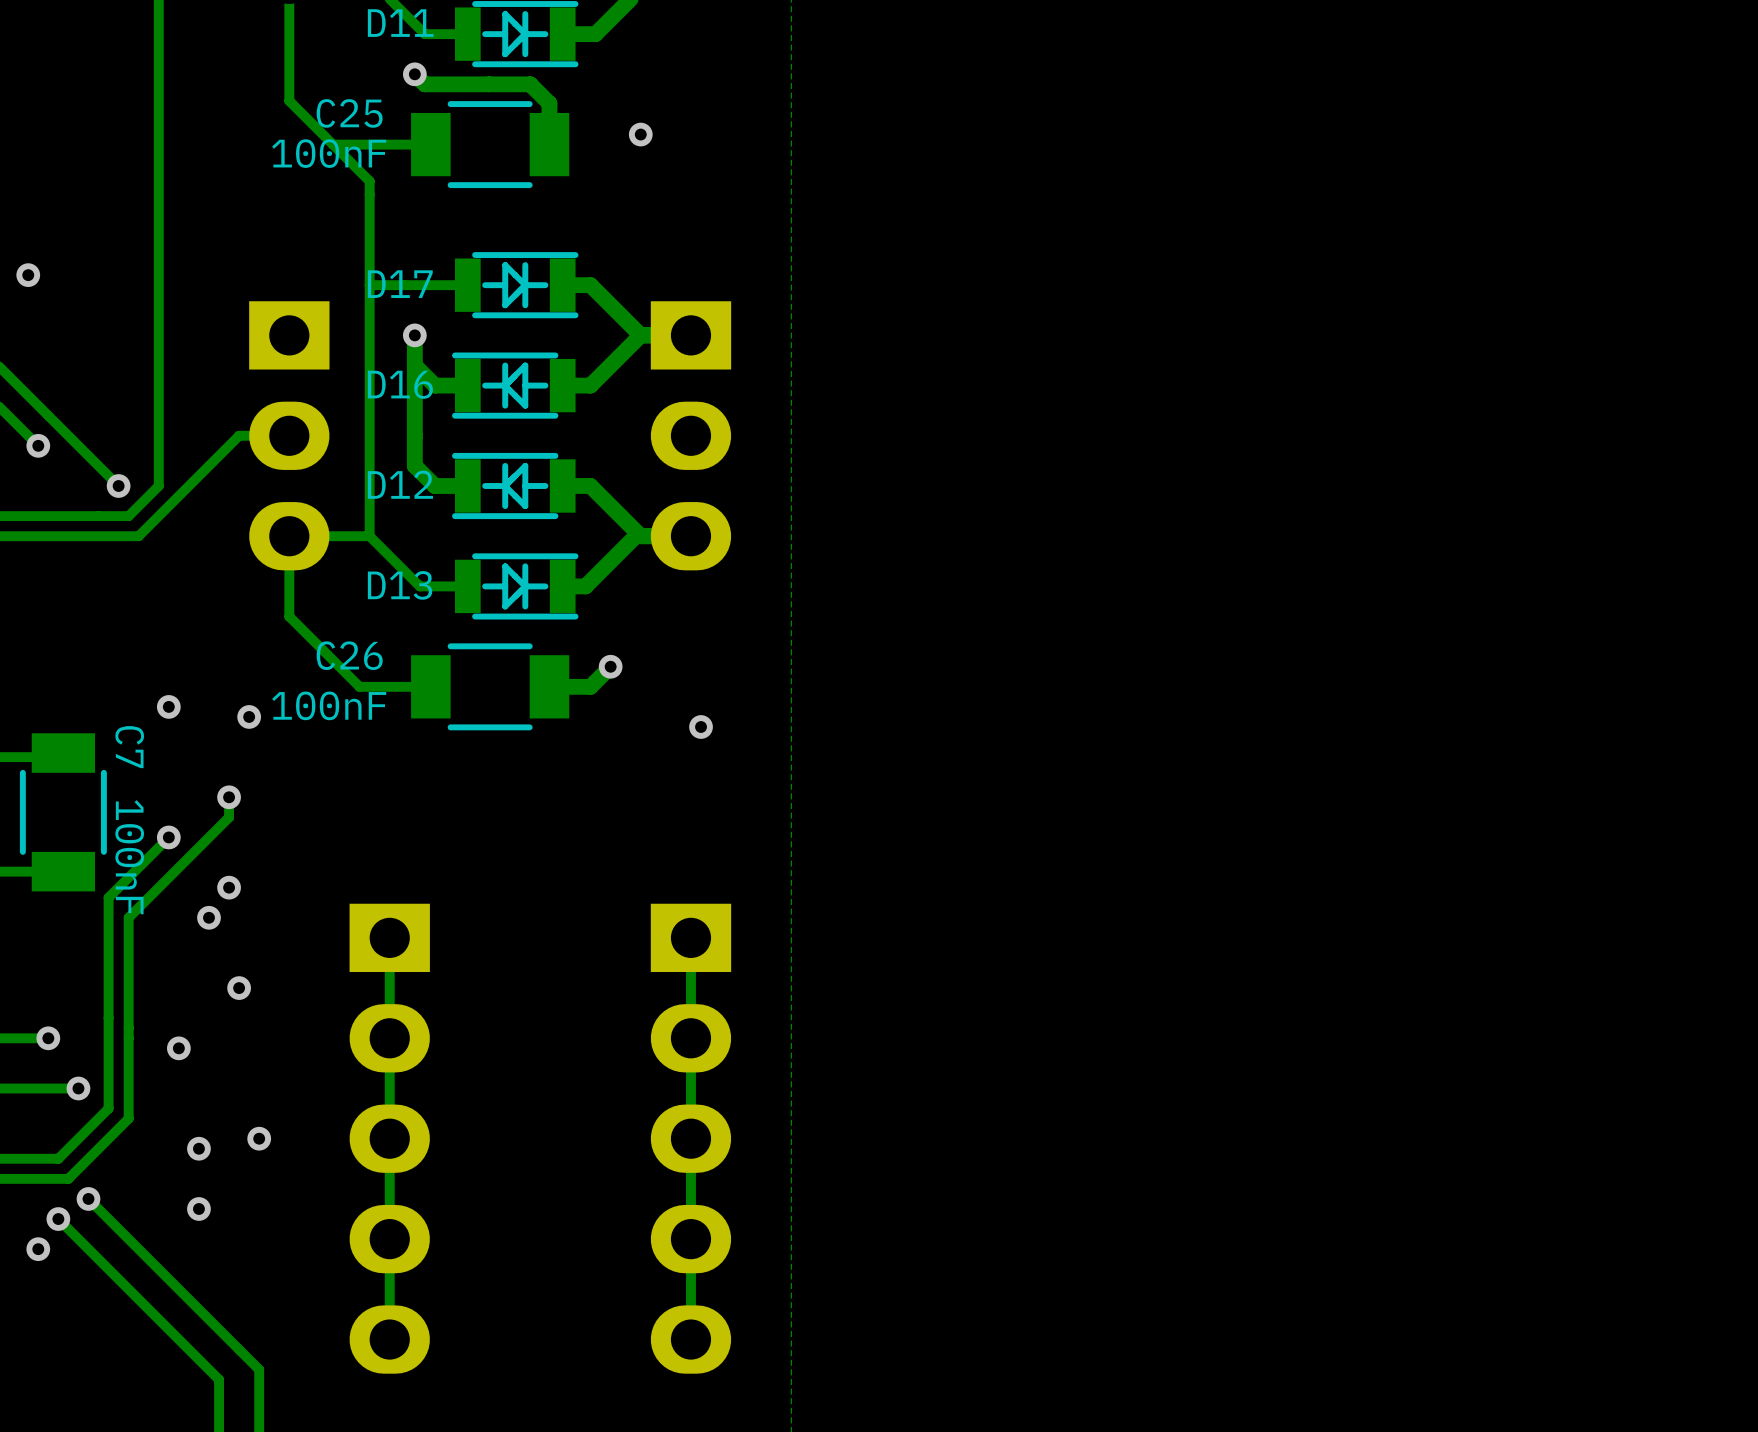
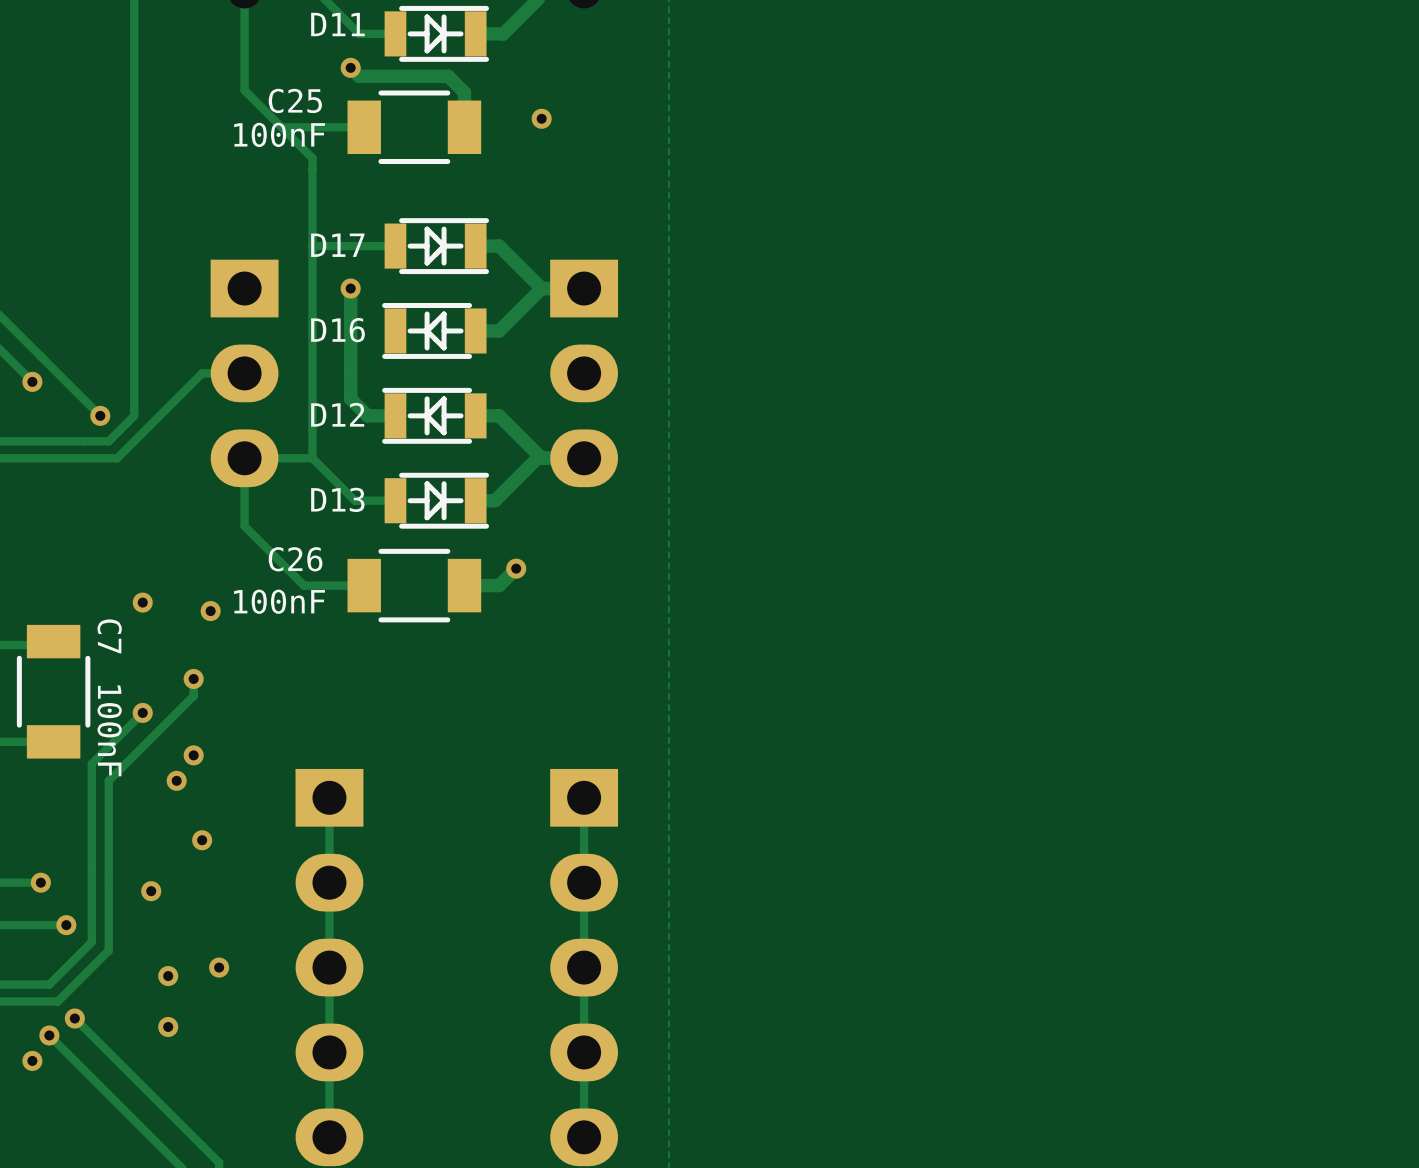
via: (28, 275) -> none
track: (414, 365) (434, 385) (467, 385) -> none
via: (701, 727) -> none

